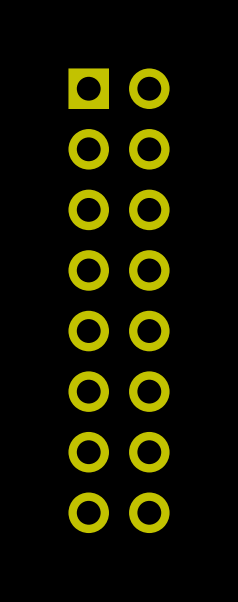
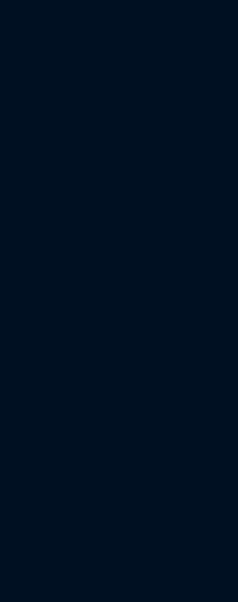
part: (119, 300) -> none

